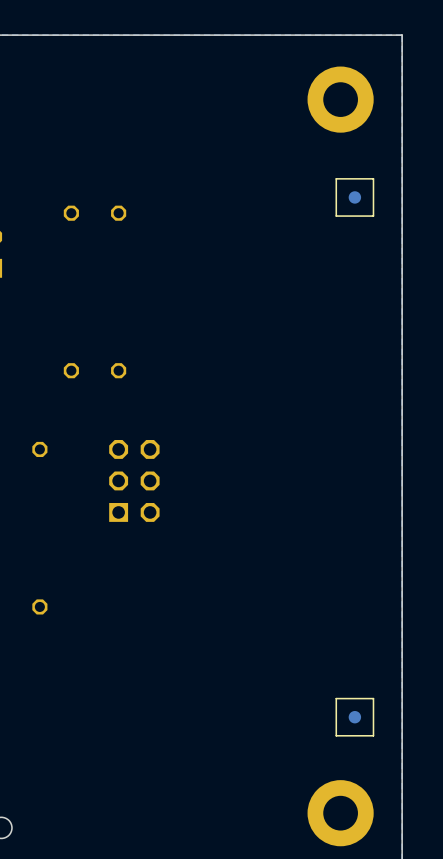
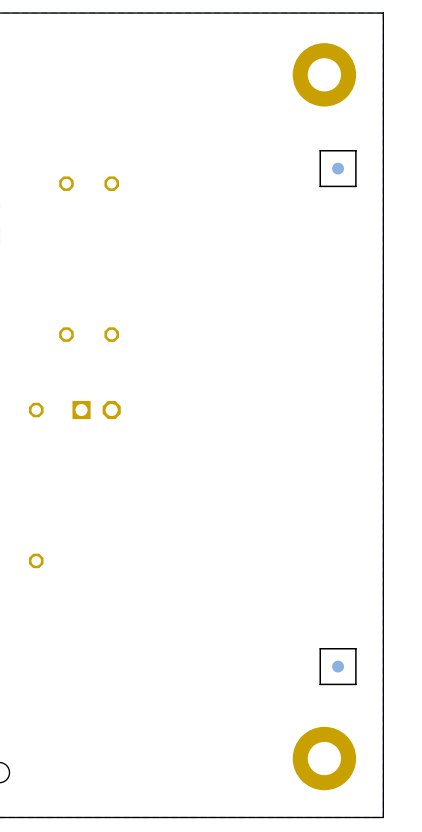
part: none -> (96, 410)
part: (134, 480) -> none

